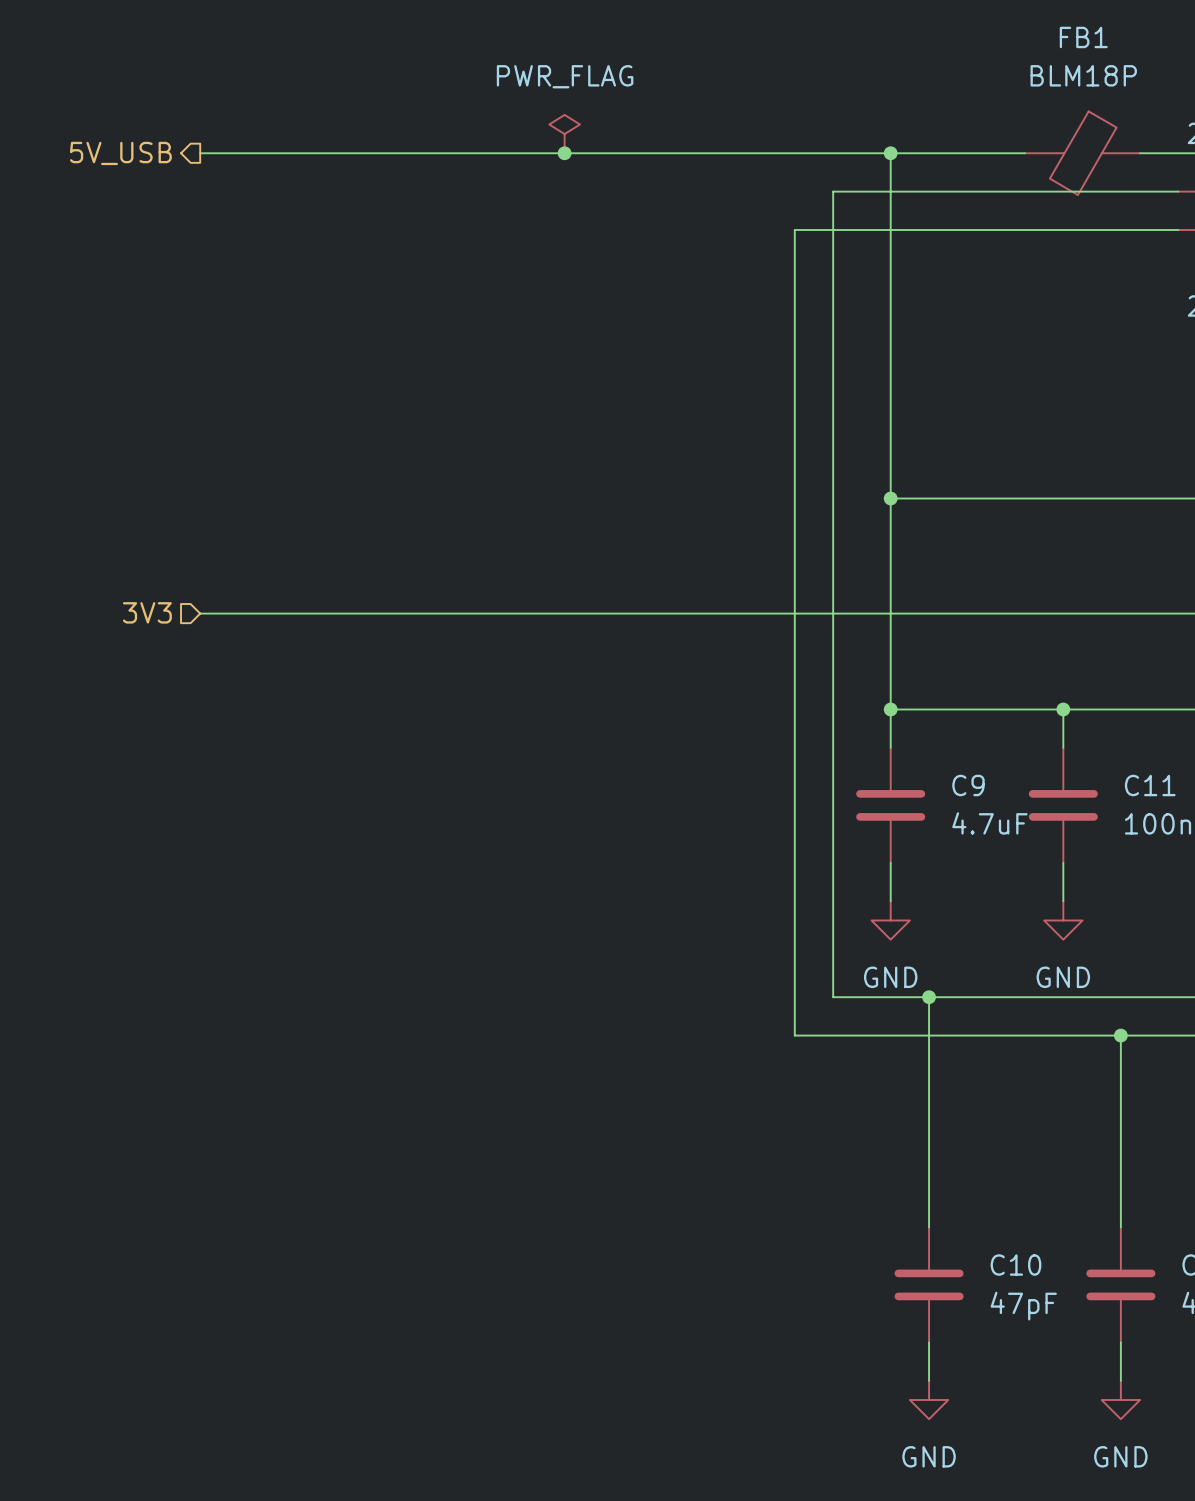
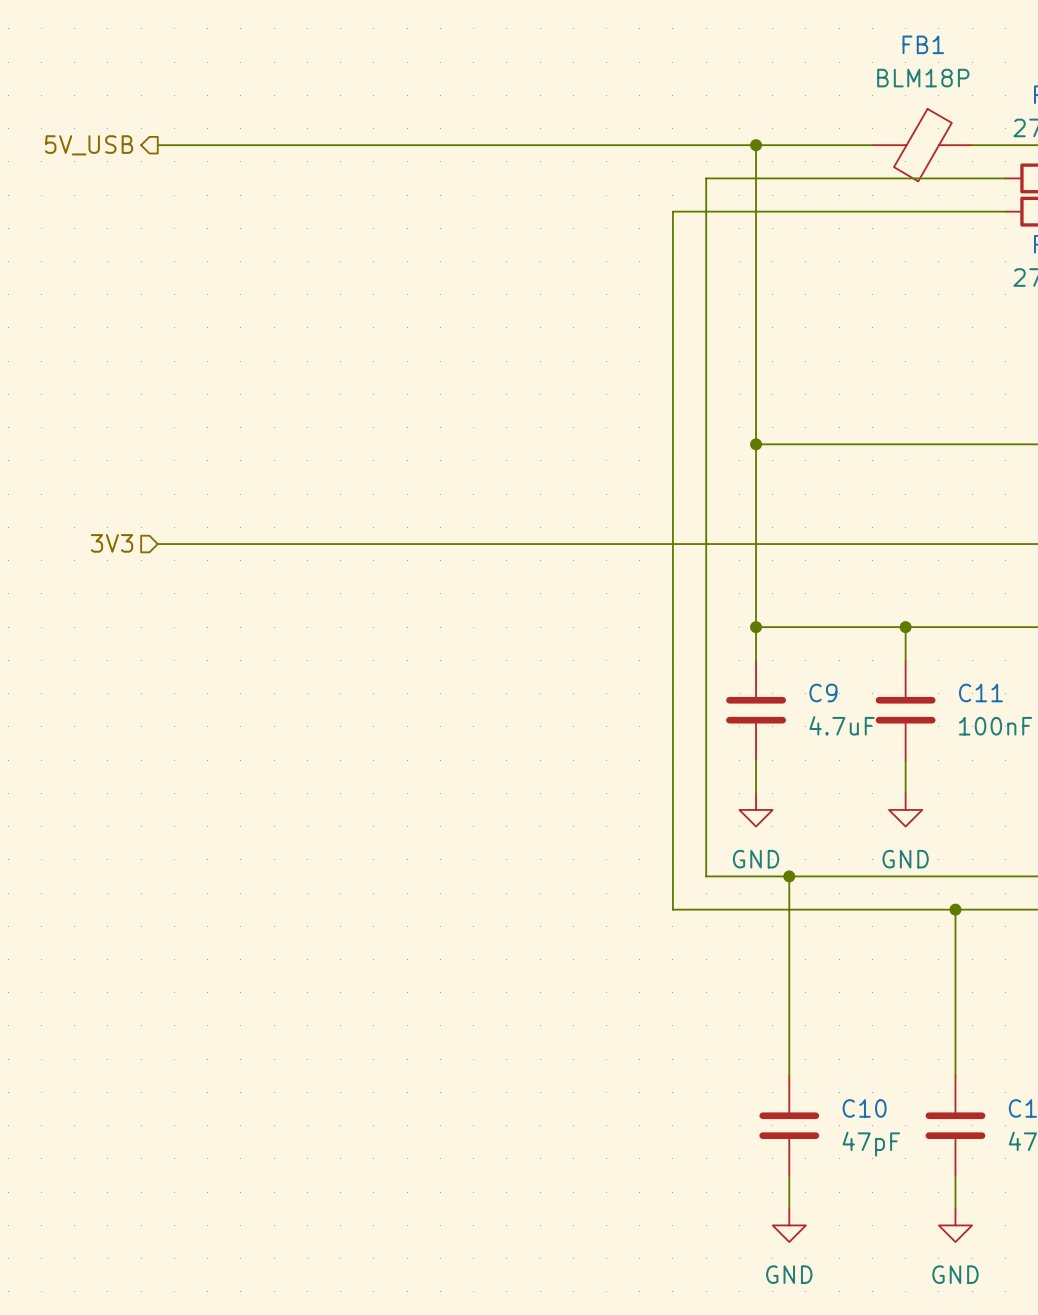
power symbol: PWR_FLAG (564, 134) -> none
junction: (564, 153) -> none

